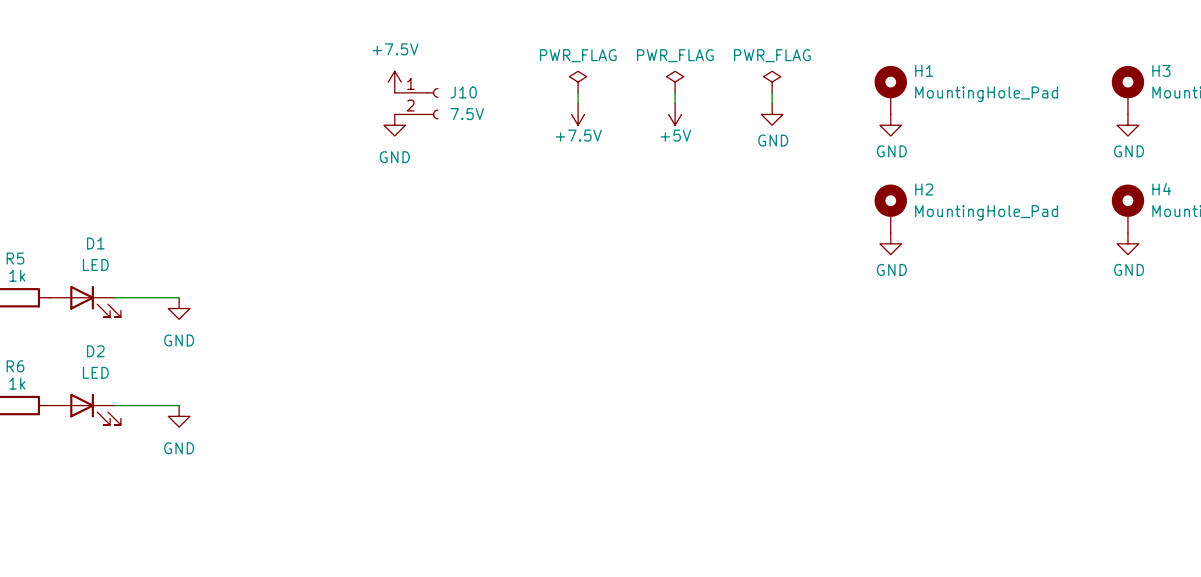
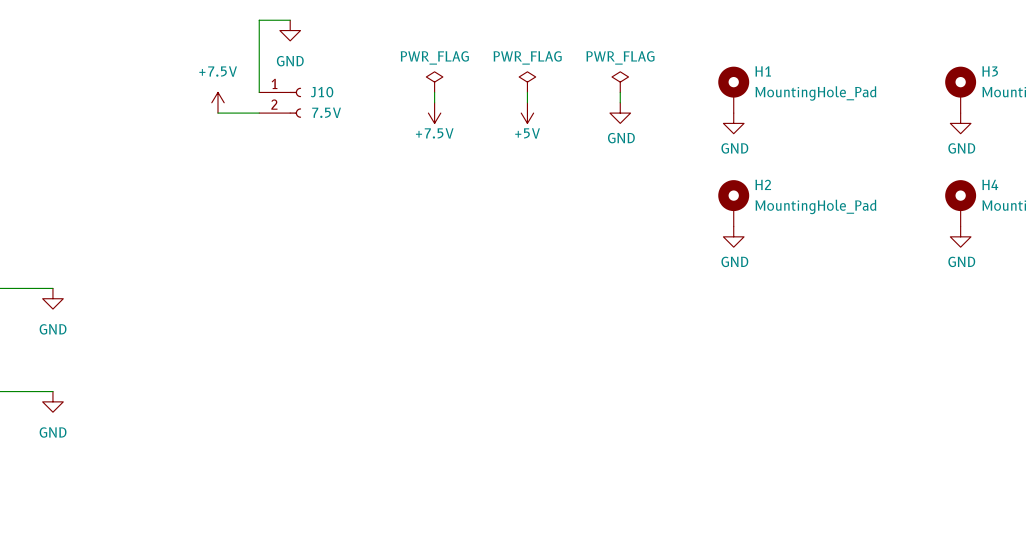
wire: none -> (290, 20) (259, 20) (259, 92)
power symbol position: +7.5V (394, 82) -> +7.5V (218, 102)
wire: none -> (218, 113) (259, 113)
power symbol position: GND (394, 125) -> GND (290, 30)

